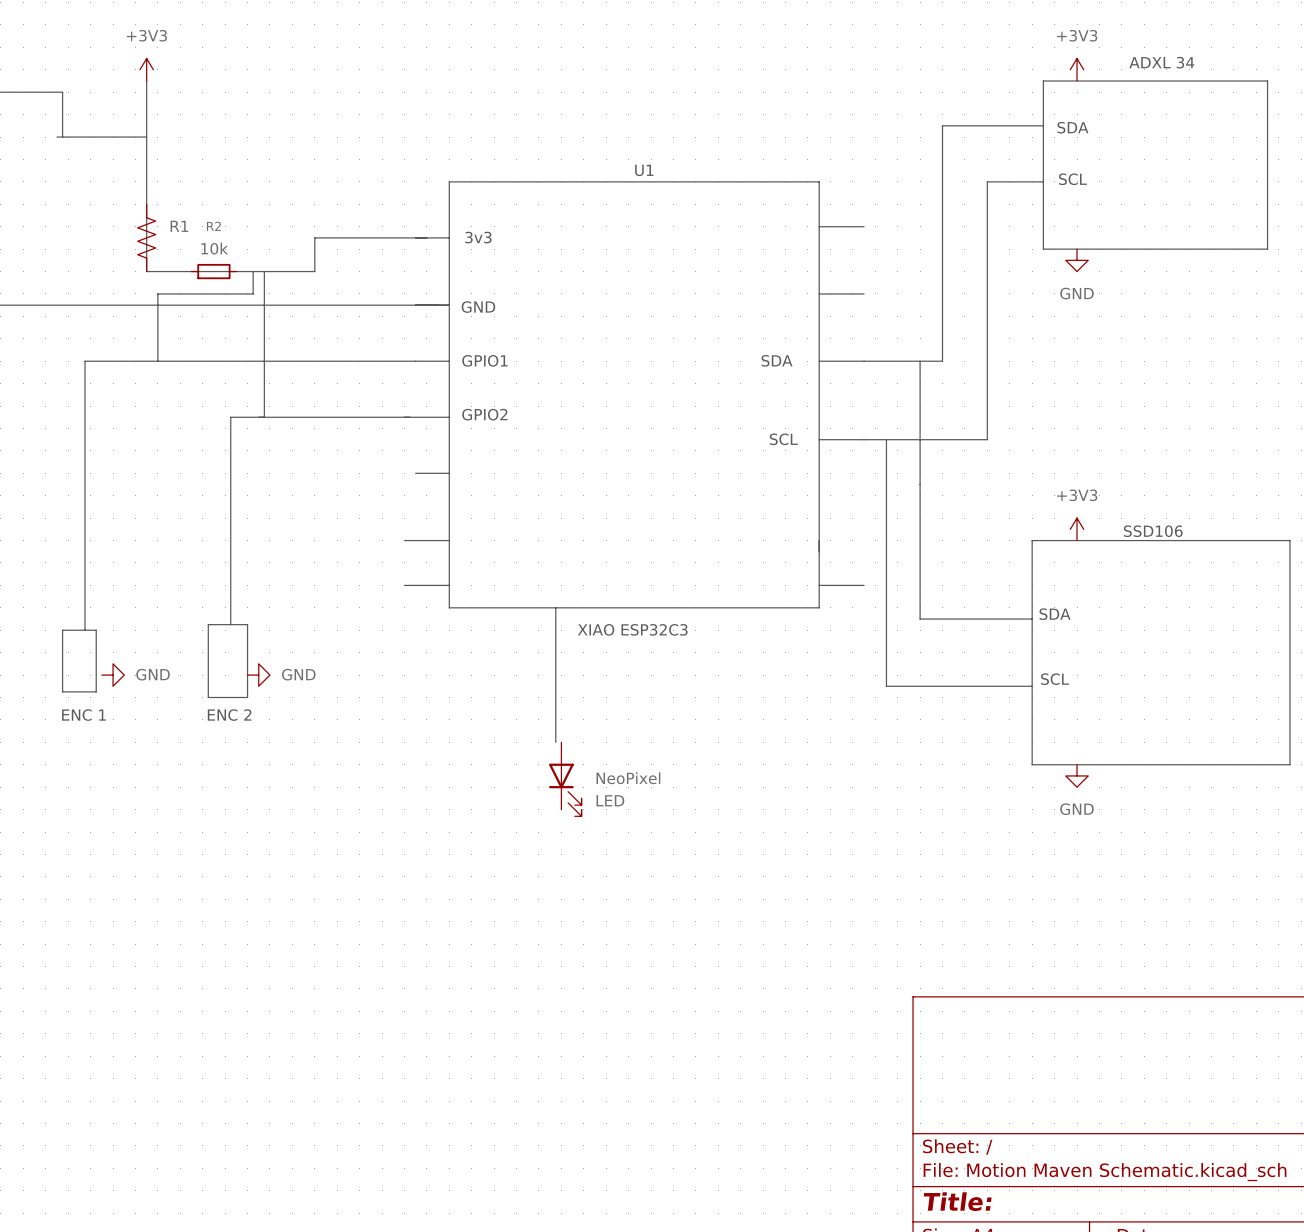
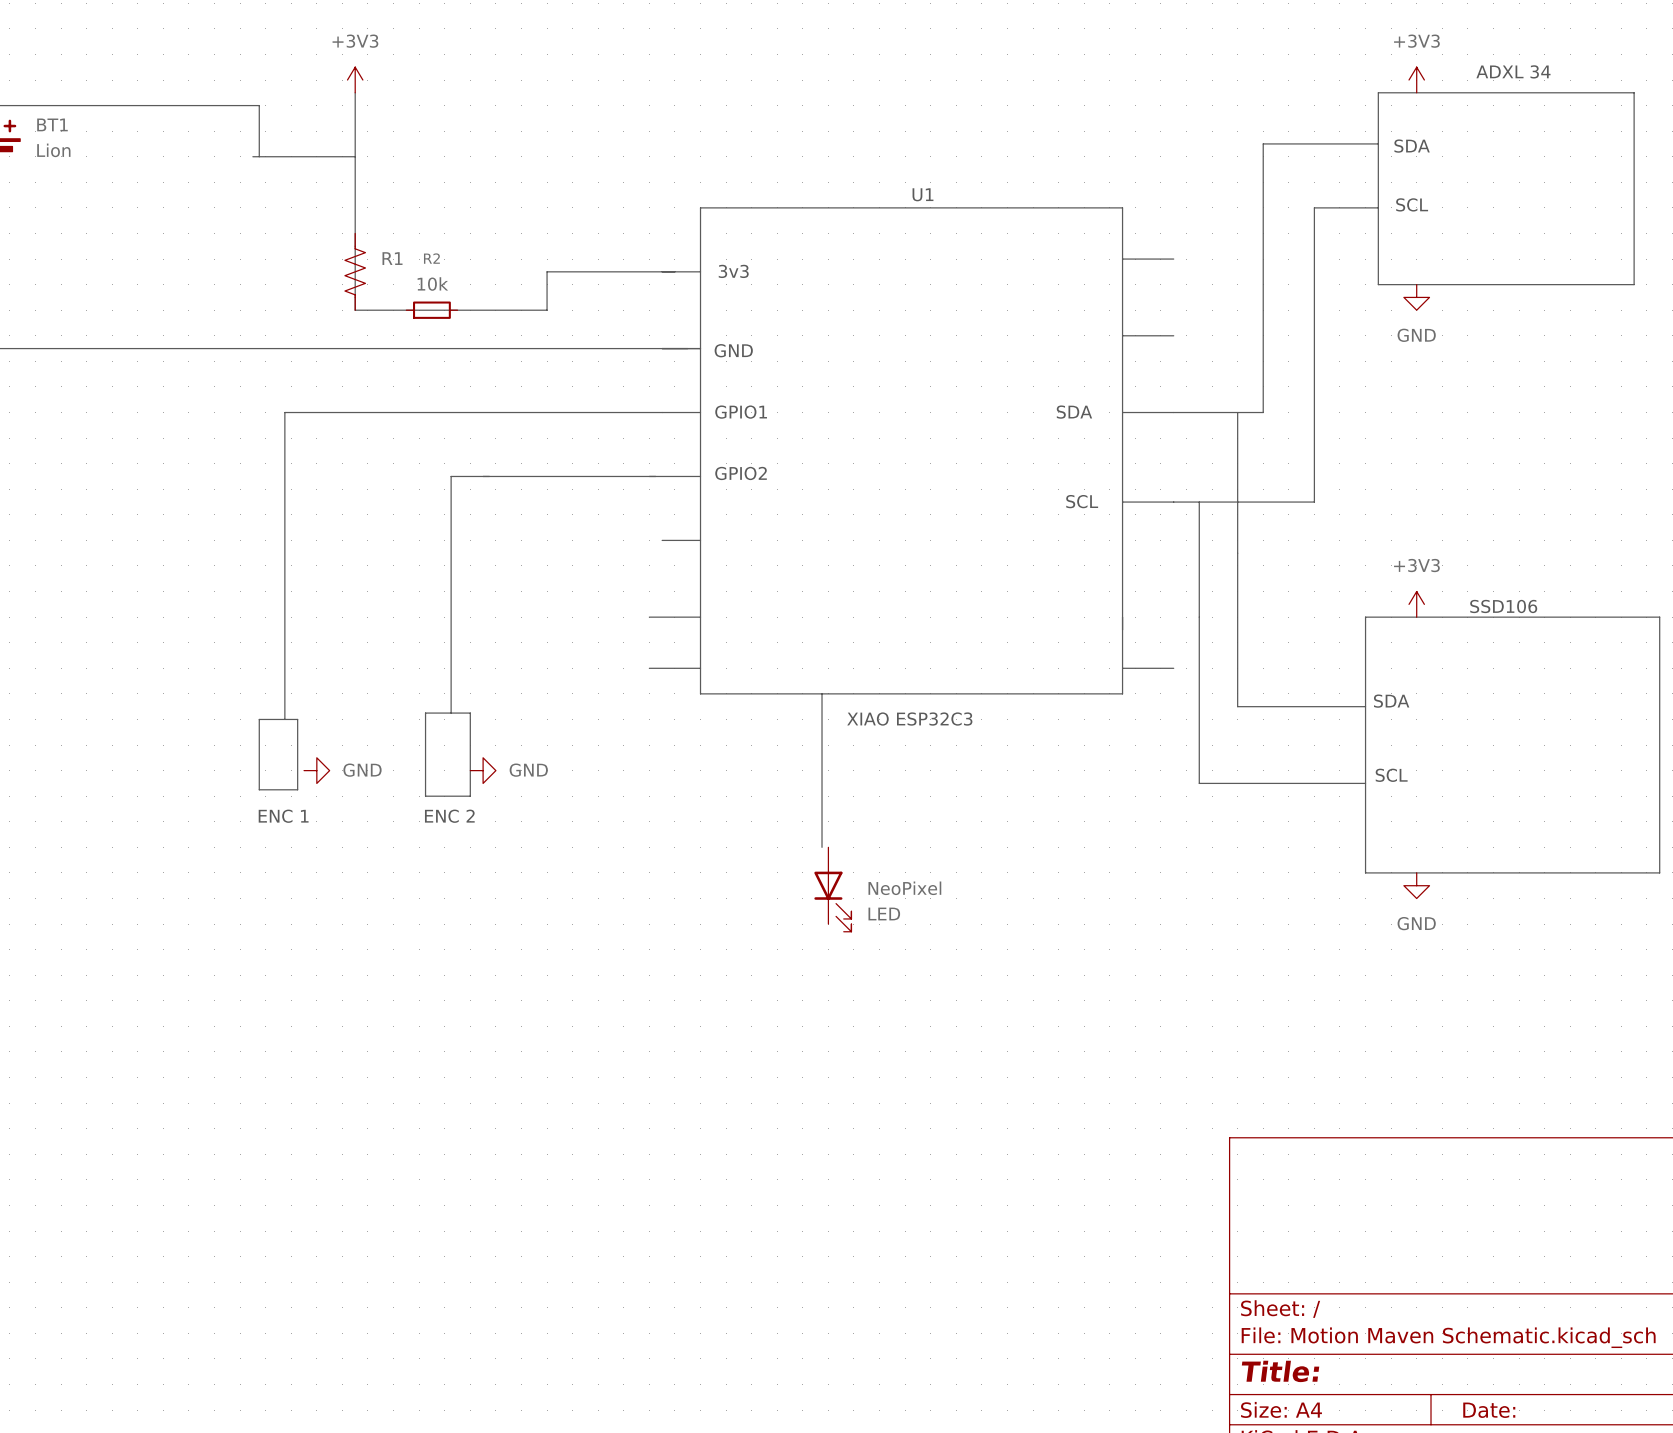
line: (253, 271) (253, 293) (157, 293) (157, 361) -> none
line: (264, 271) (264, 417) -> none

